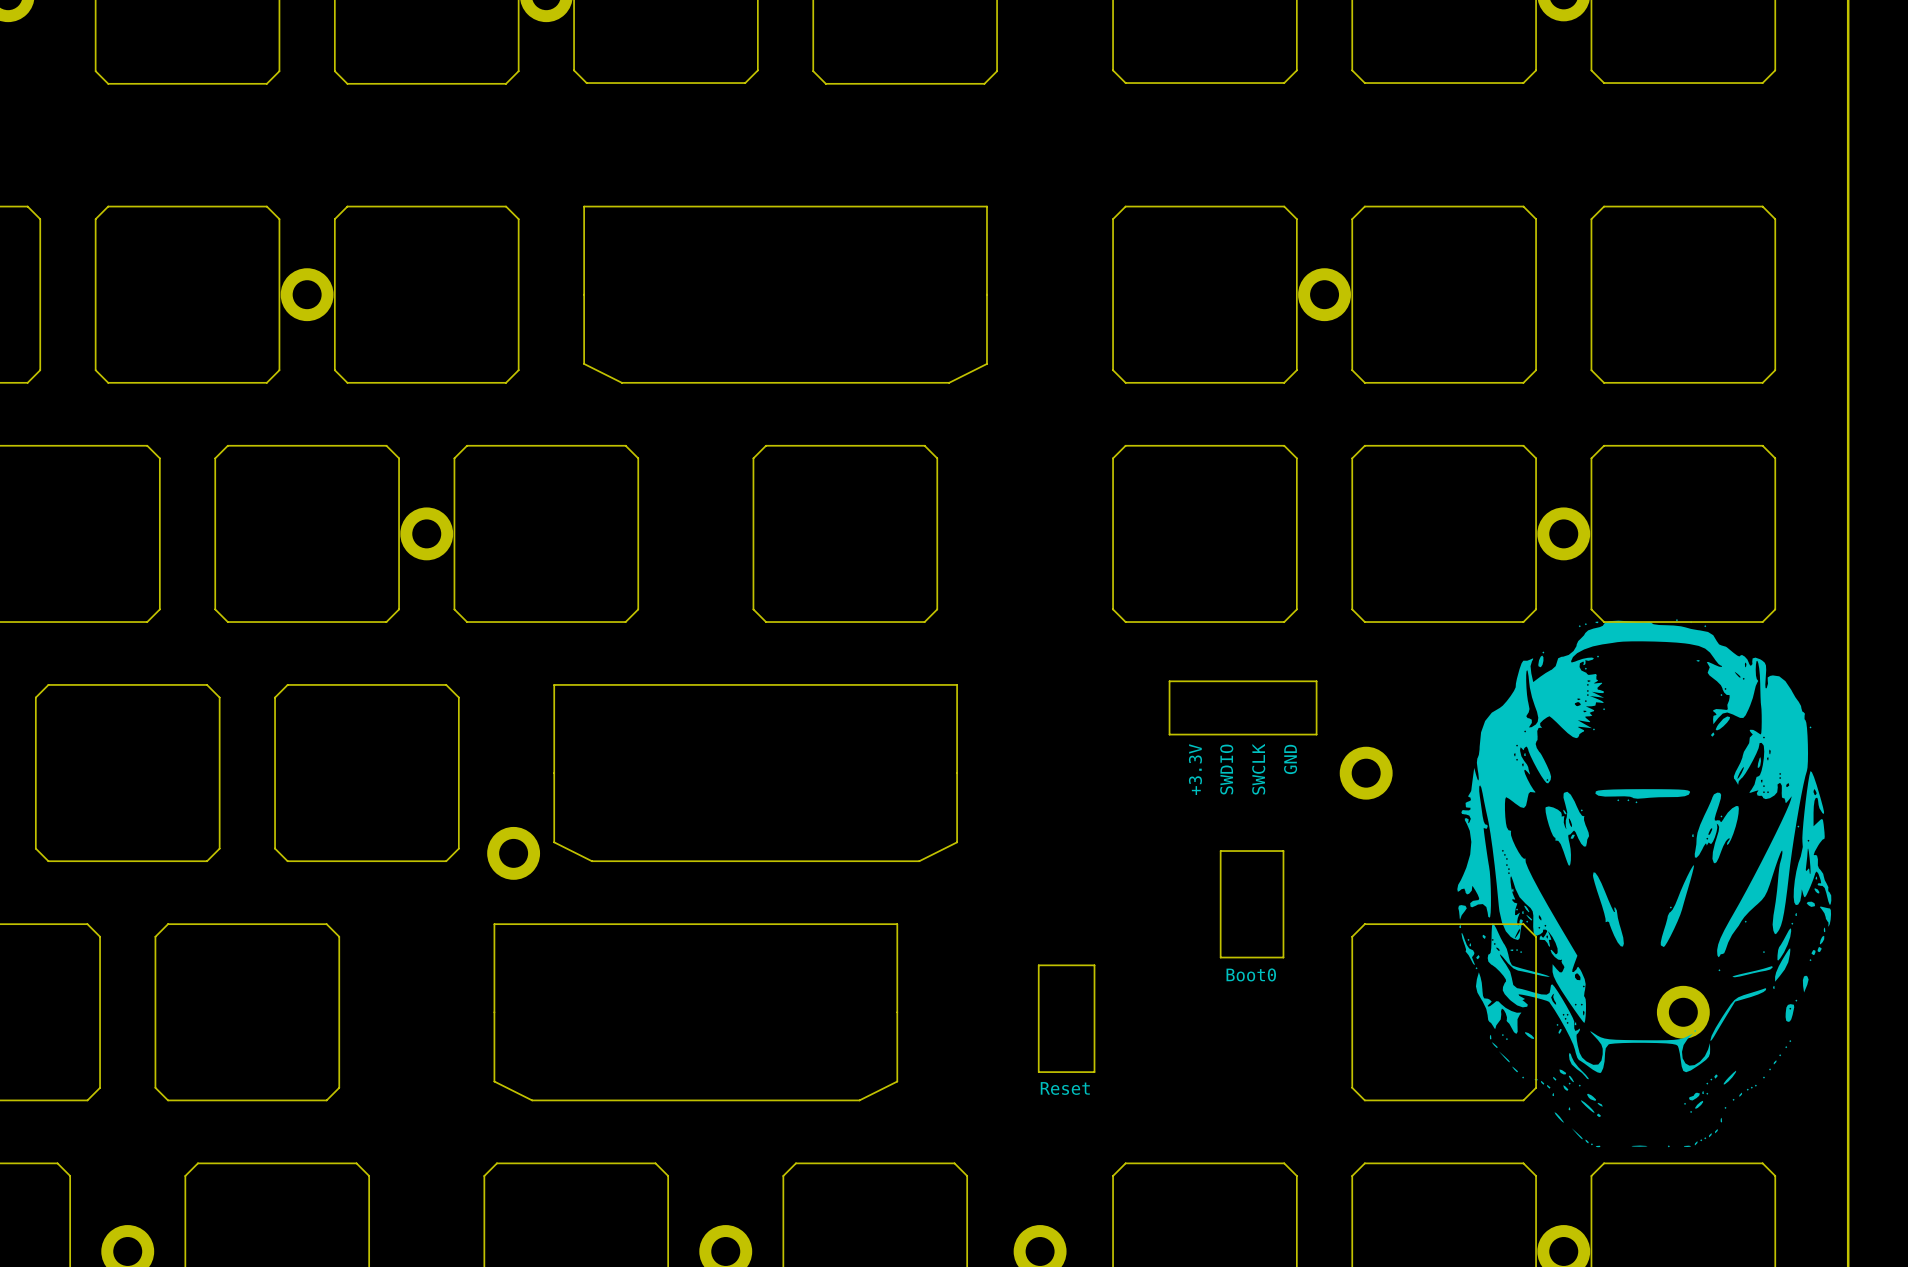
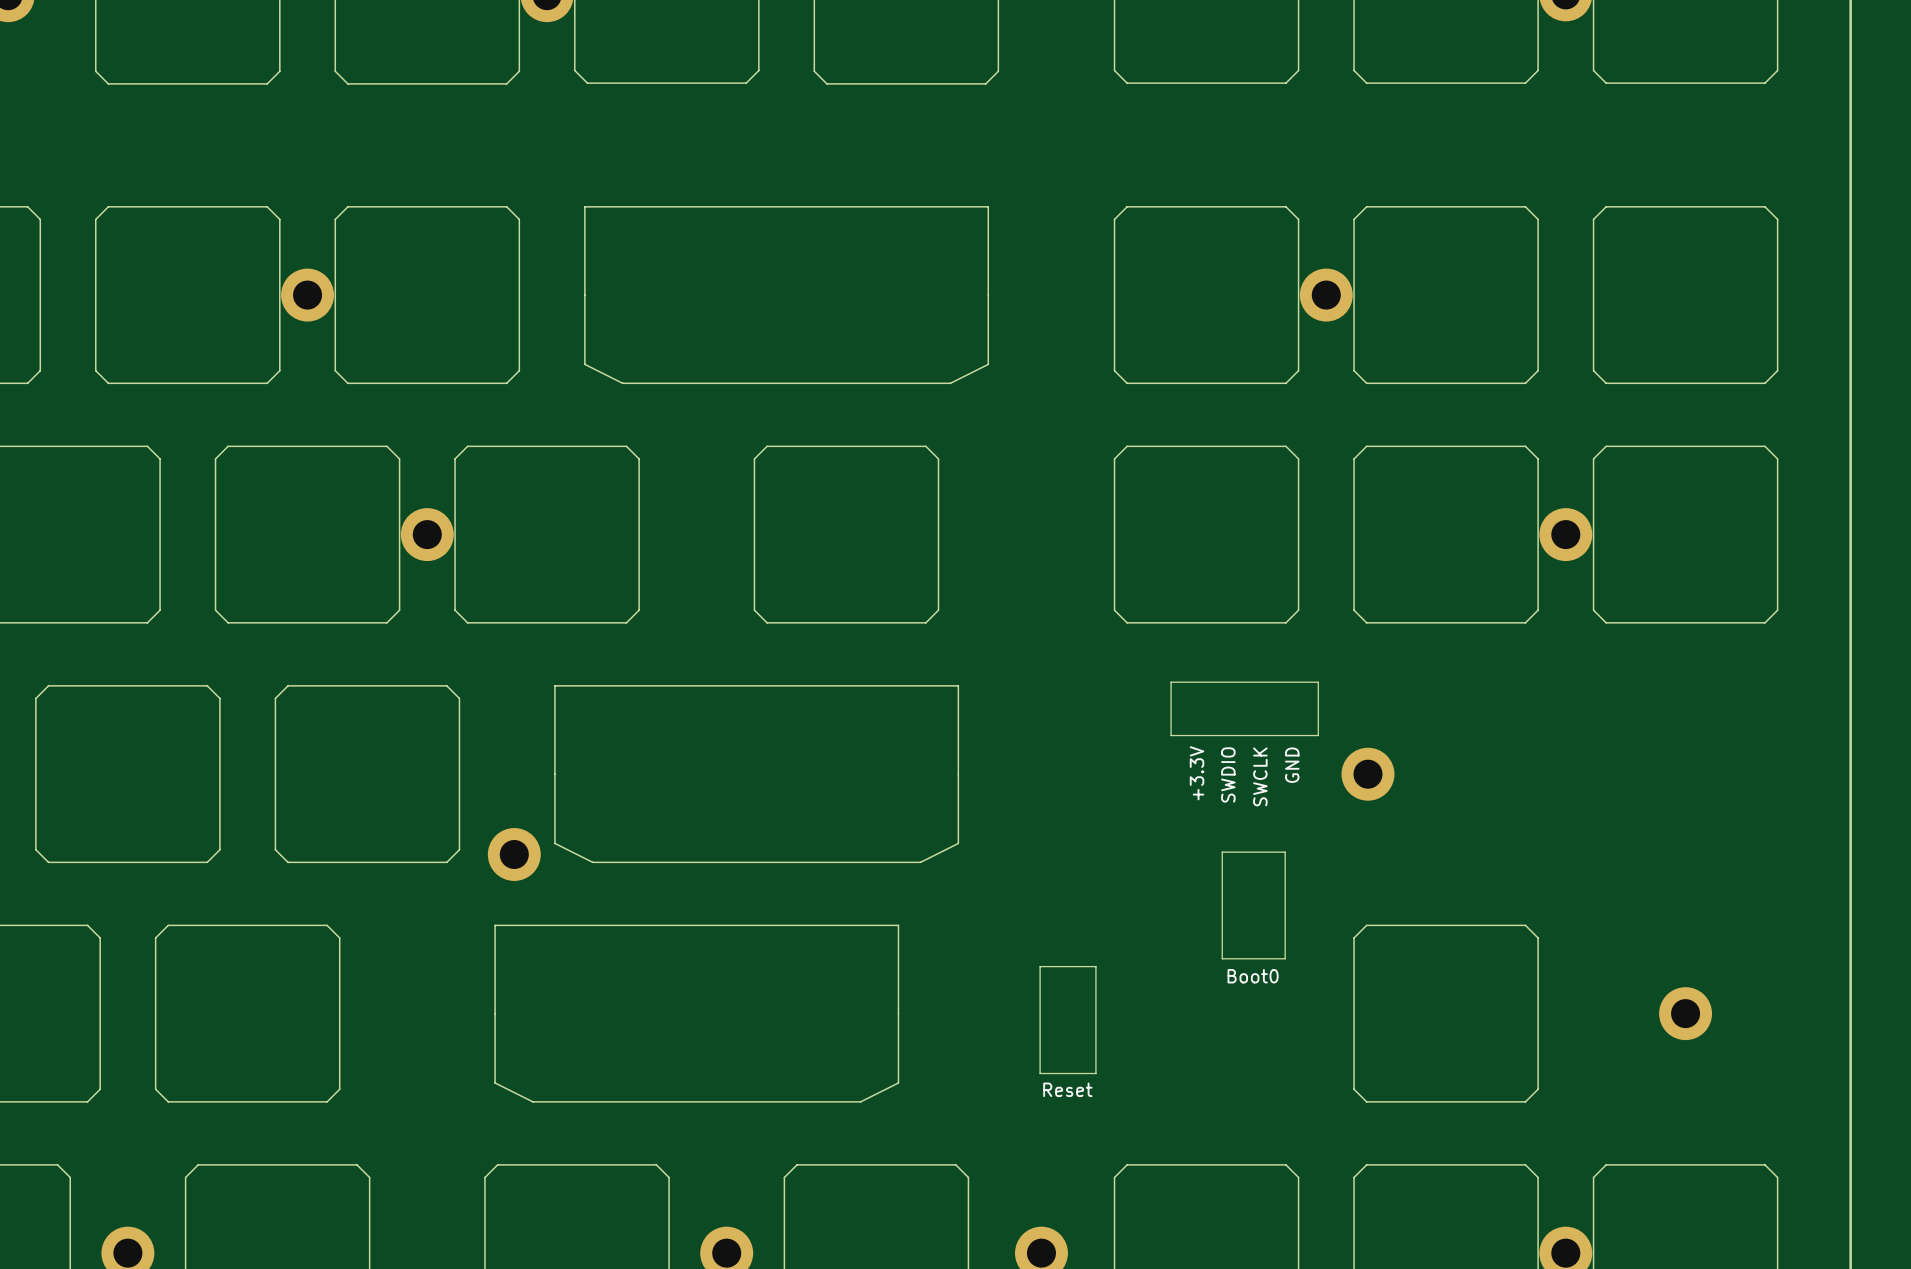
drawing: [1457, 619, 1832, 1148] -> none

